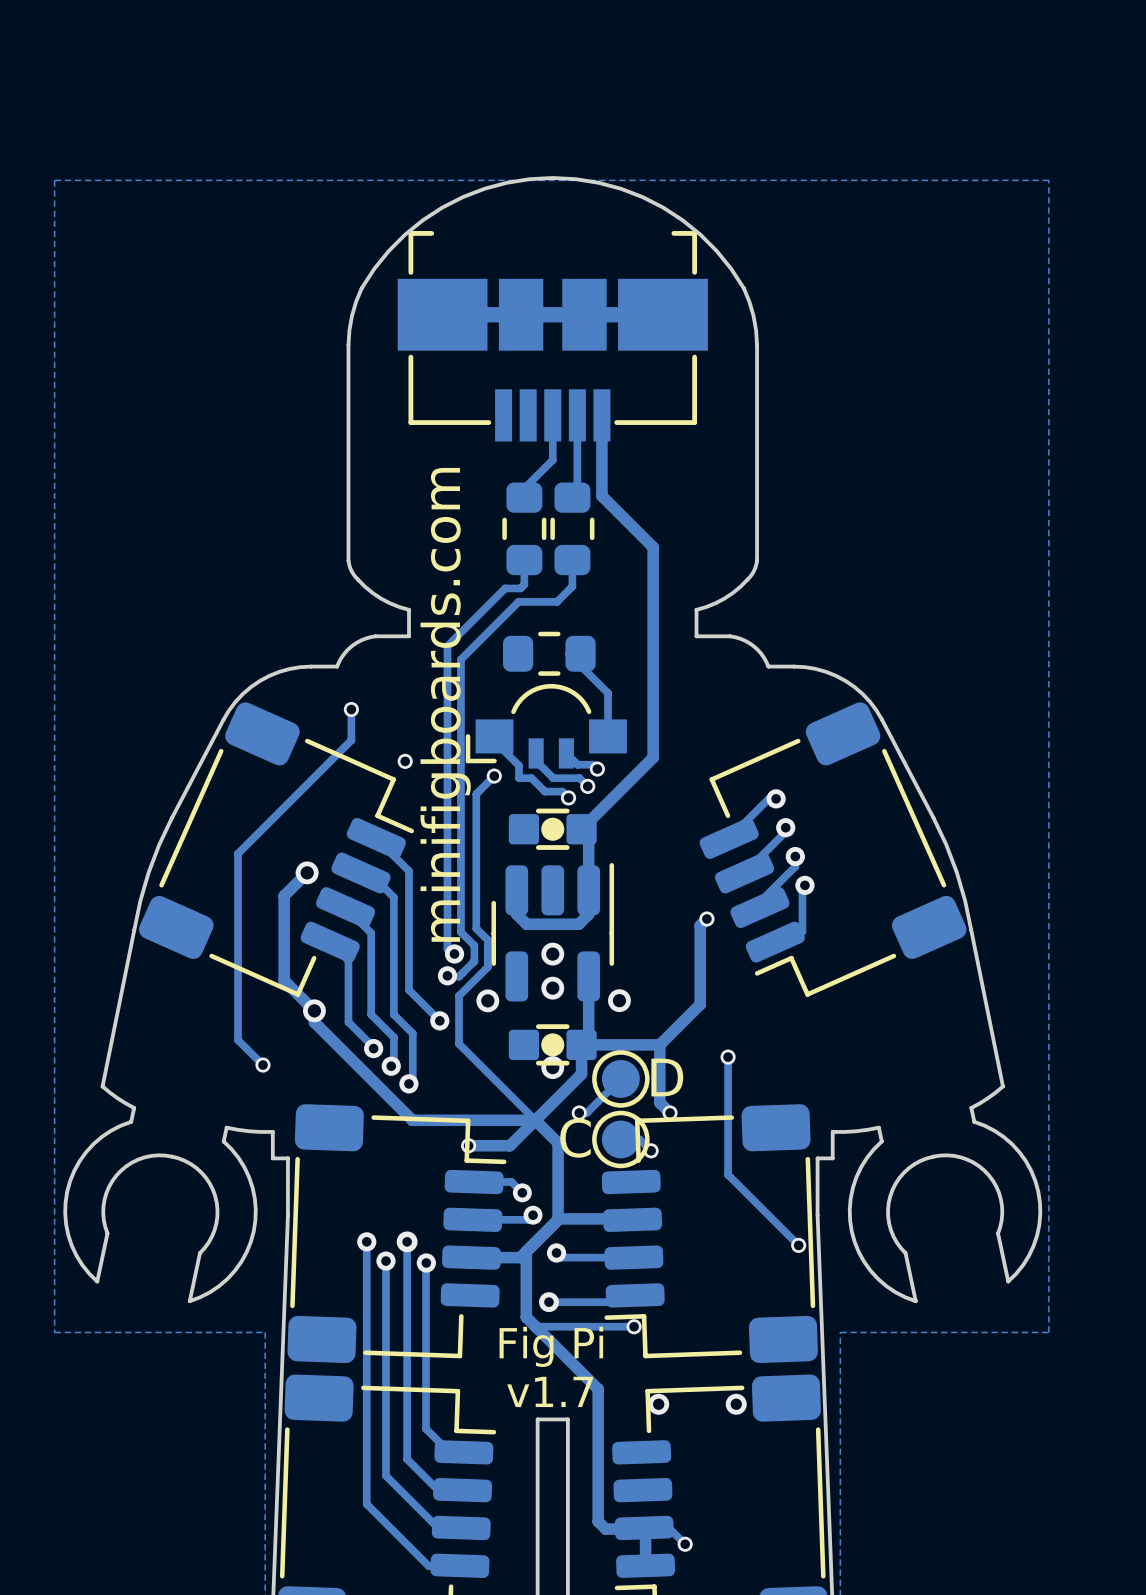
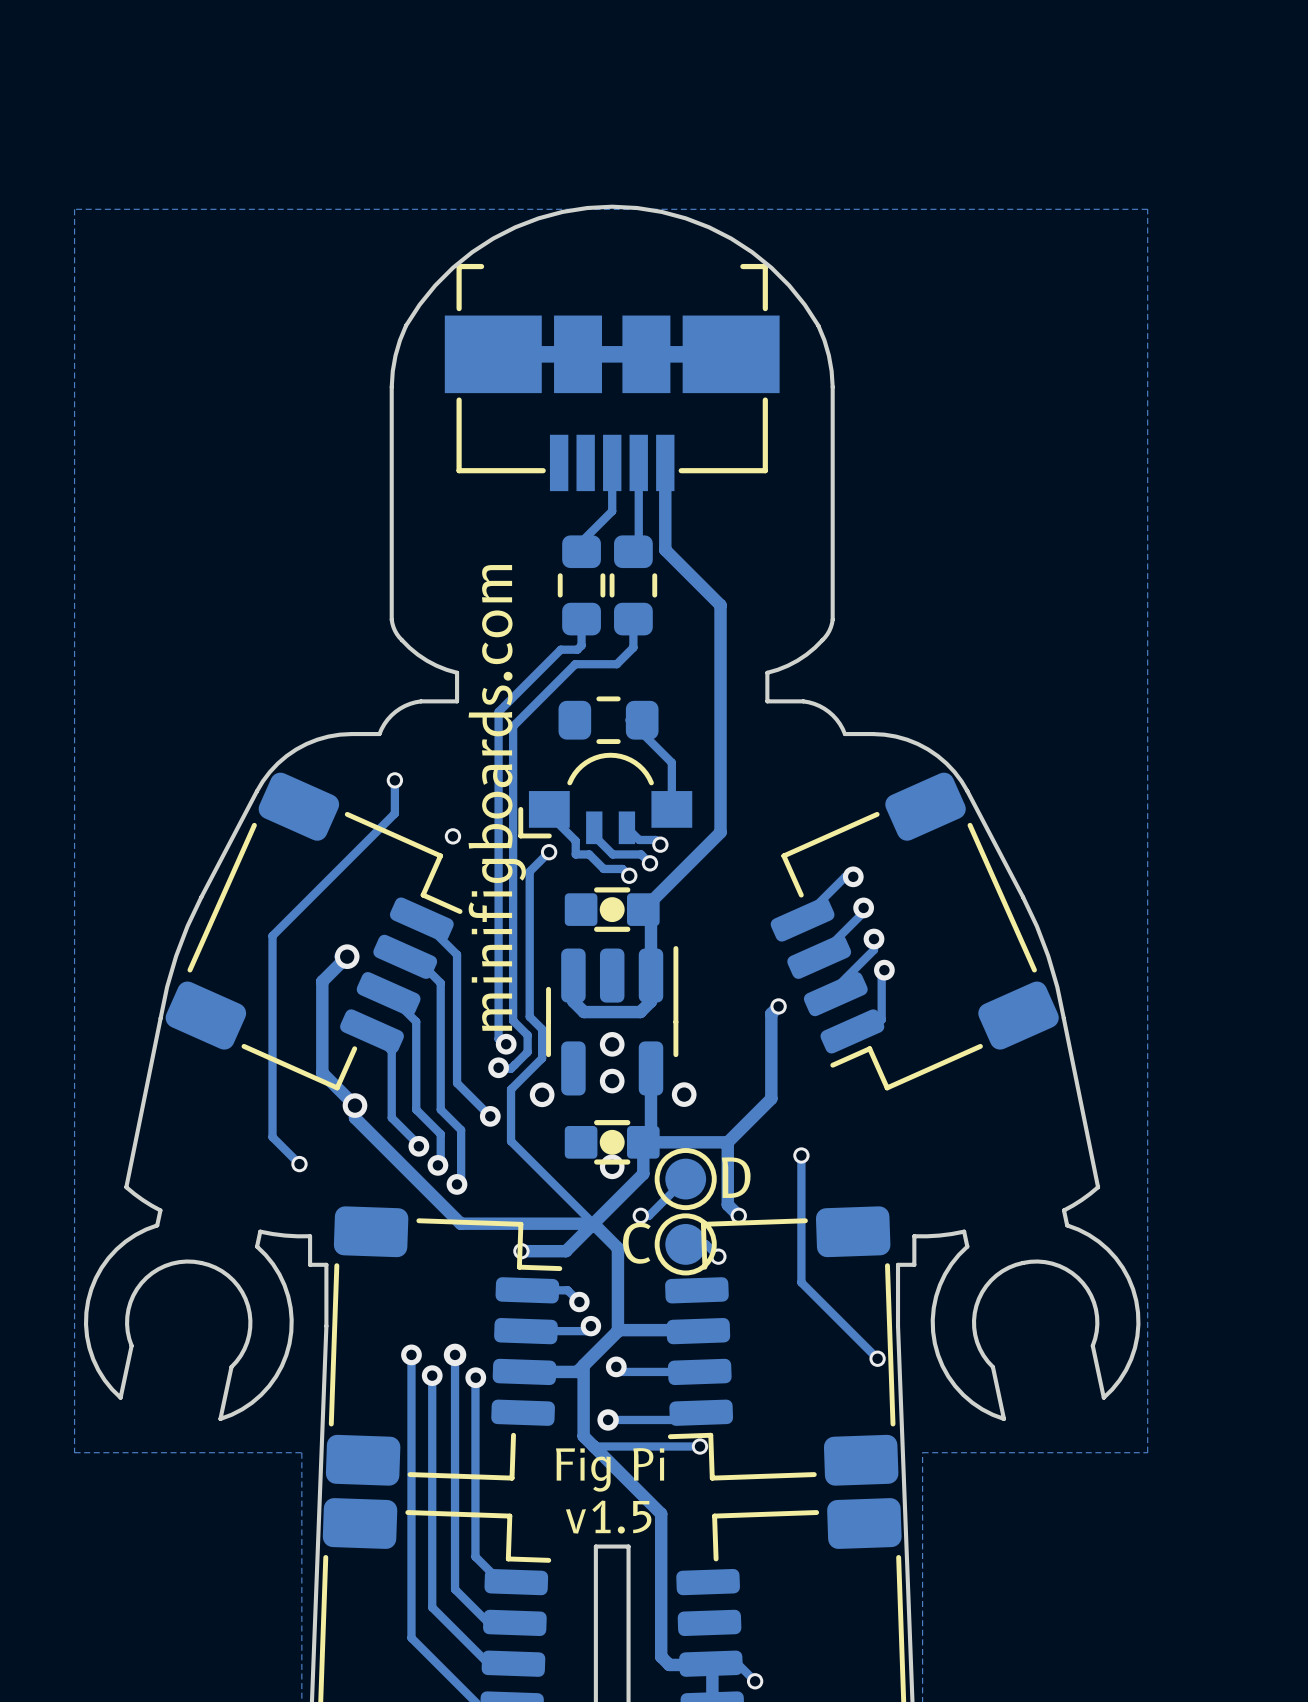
text: v1.7 (550, 1391) -> v1.5 (608, 1517)
via: (658, 1404) -> none
via: (736, 1404) -> none

